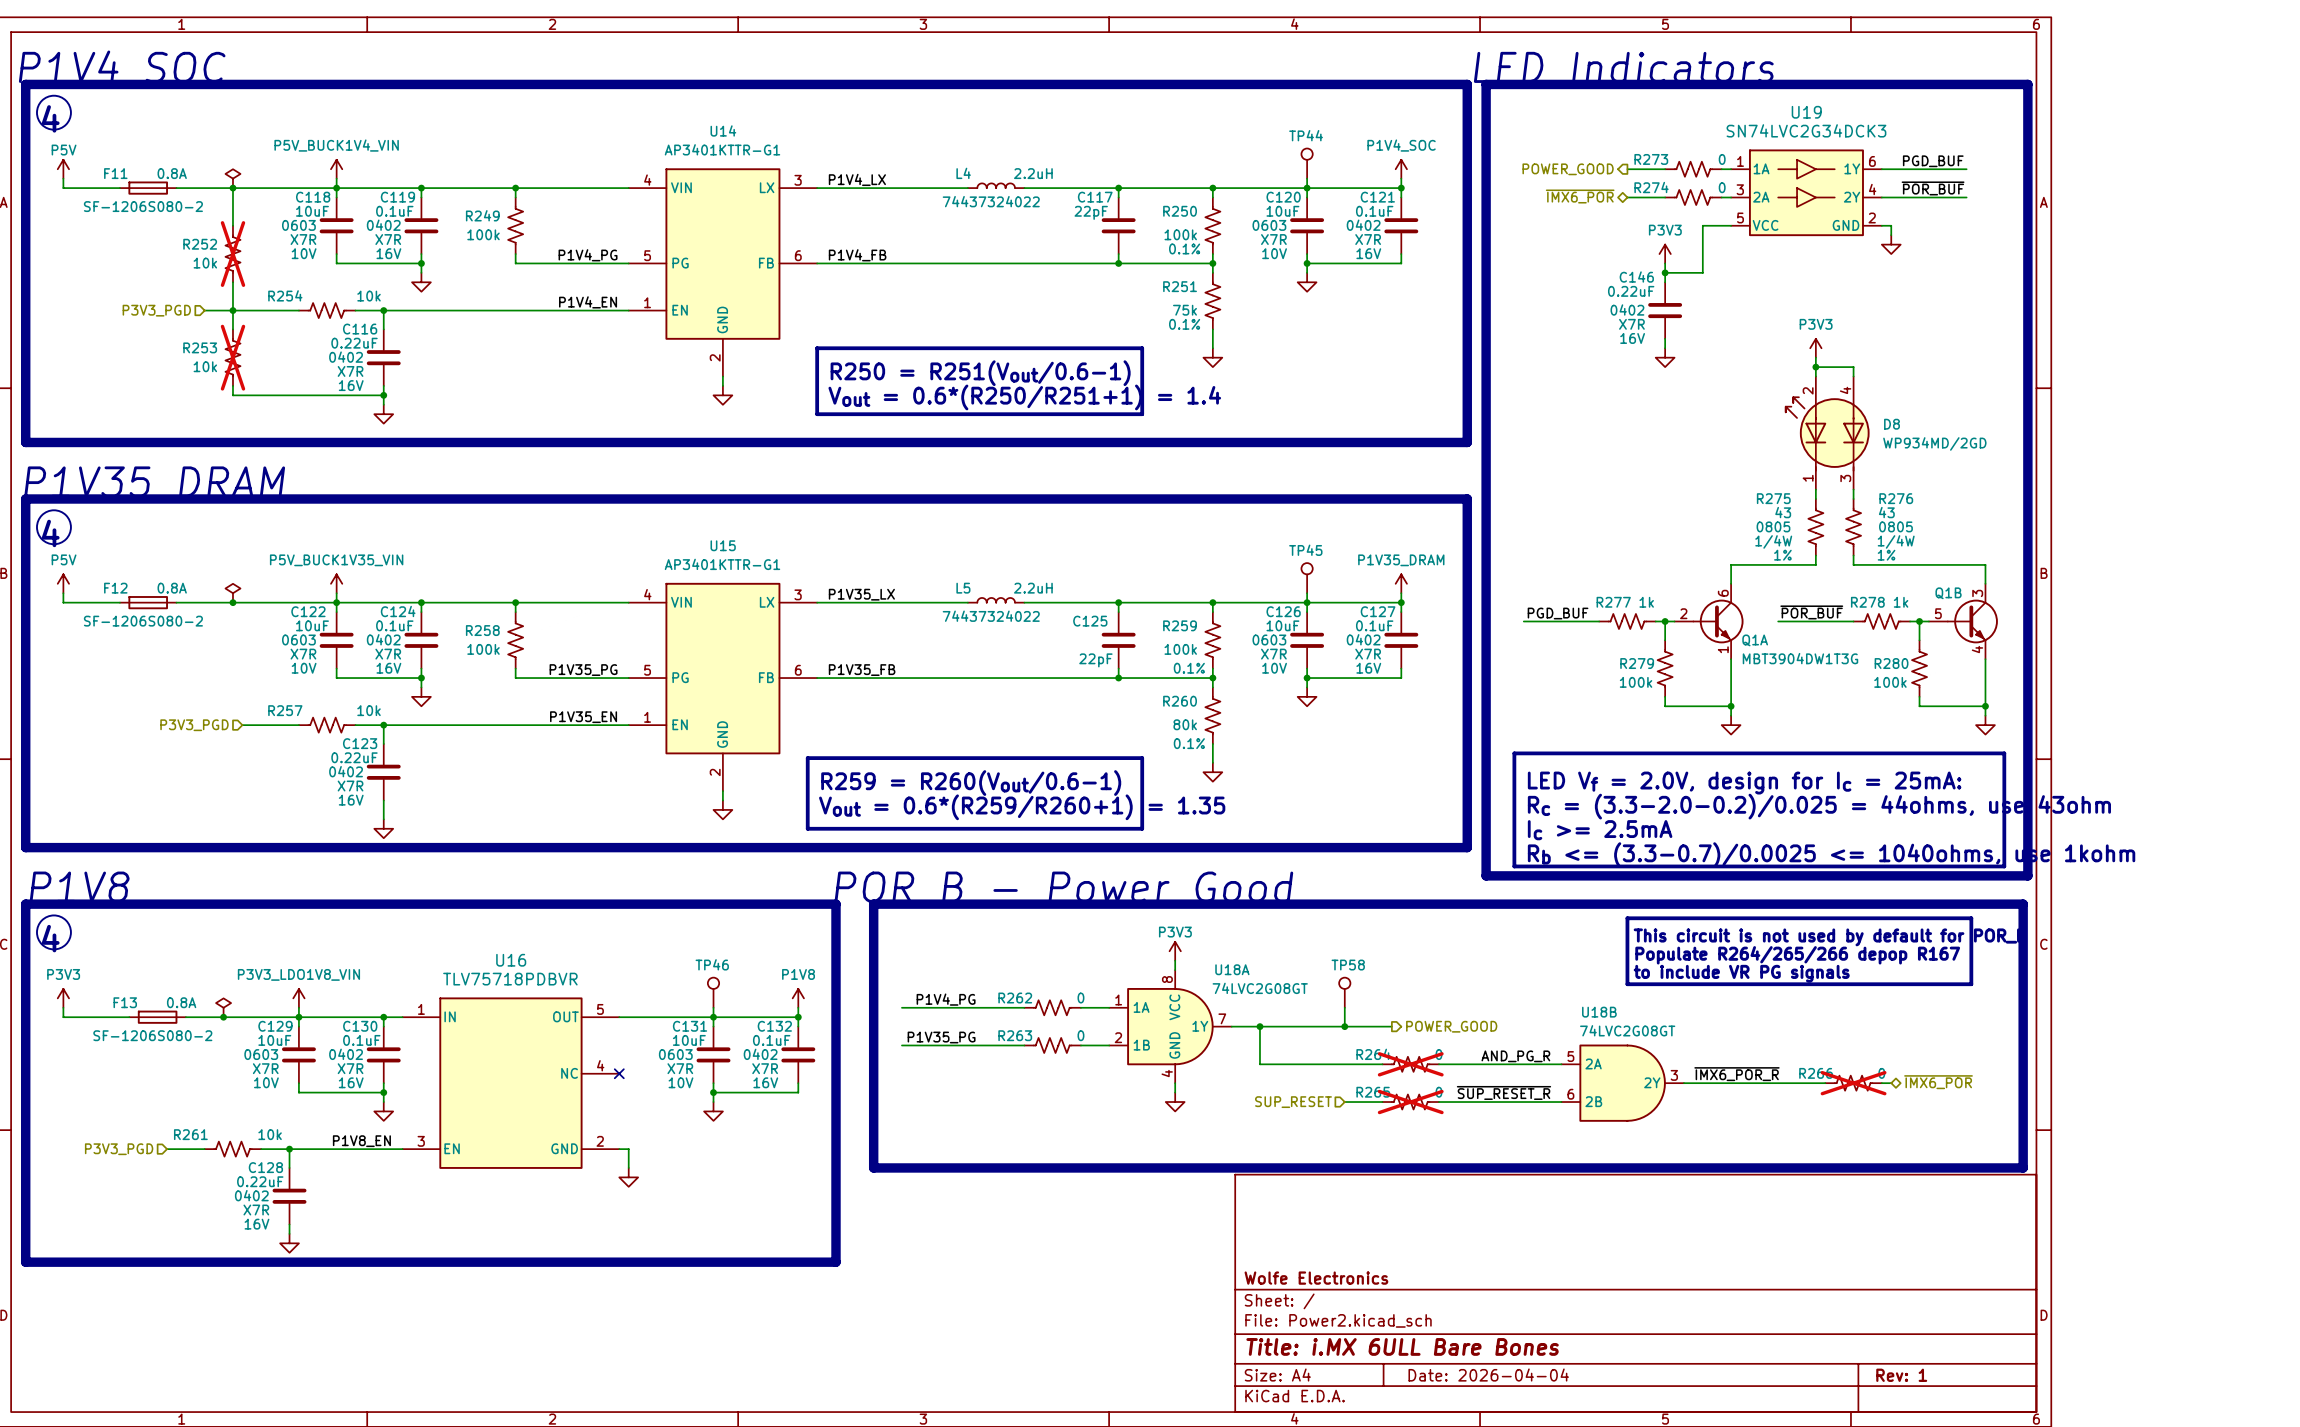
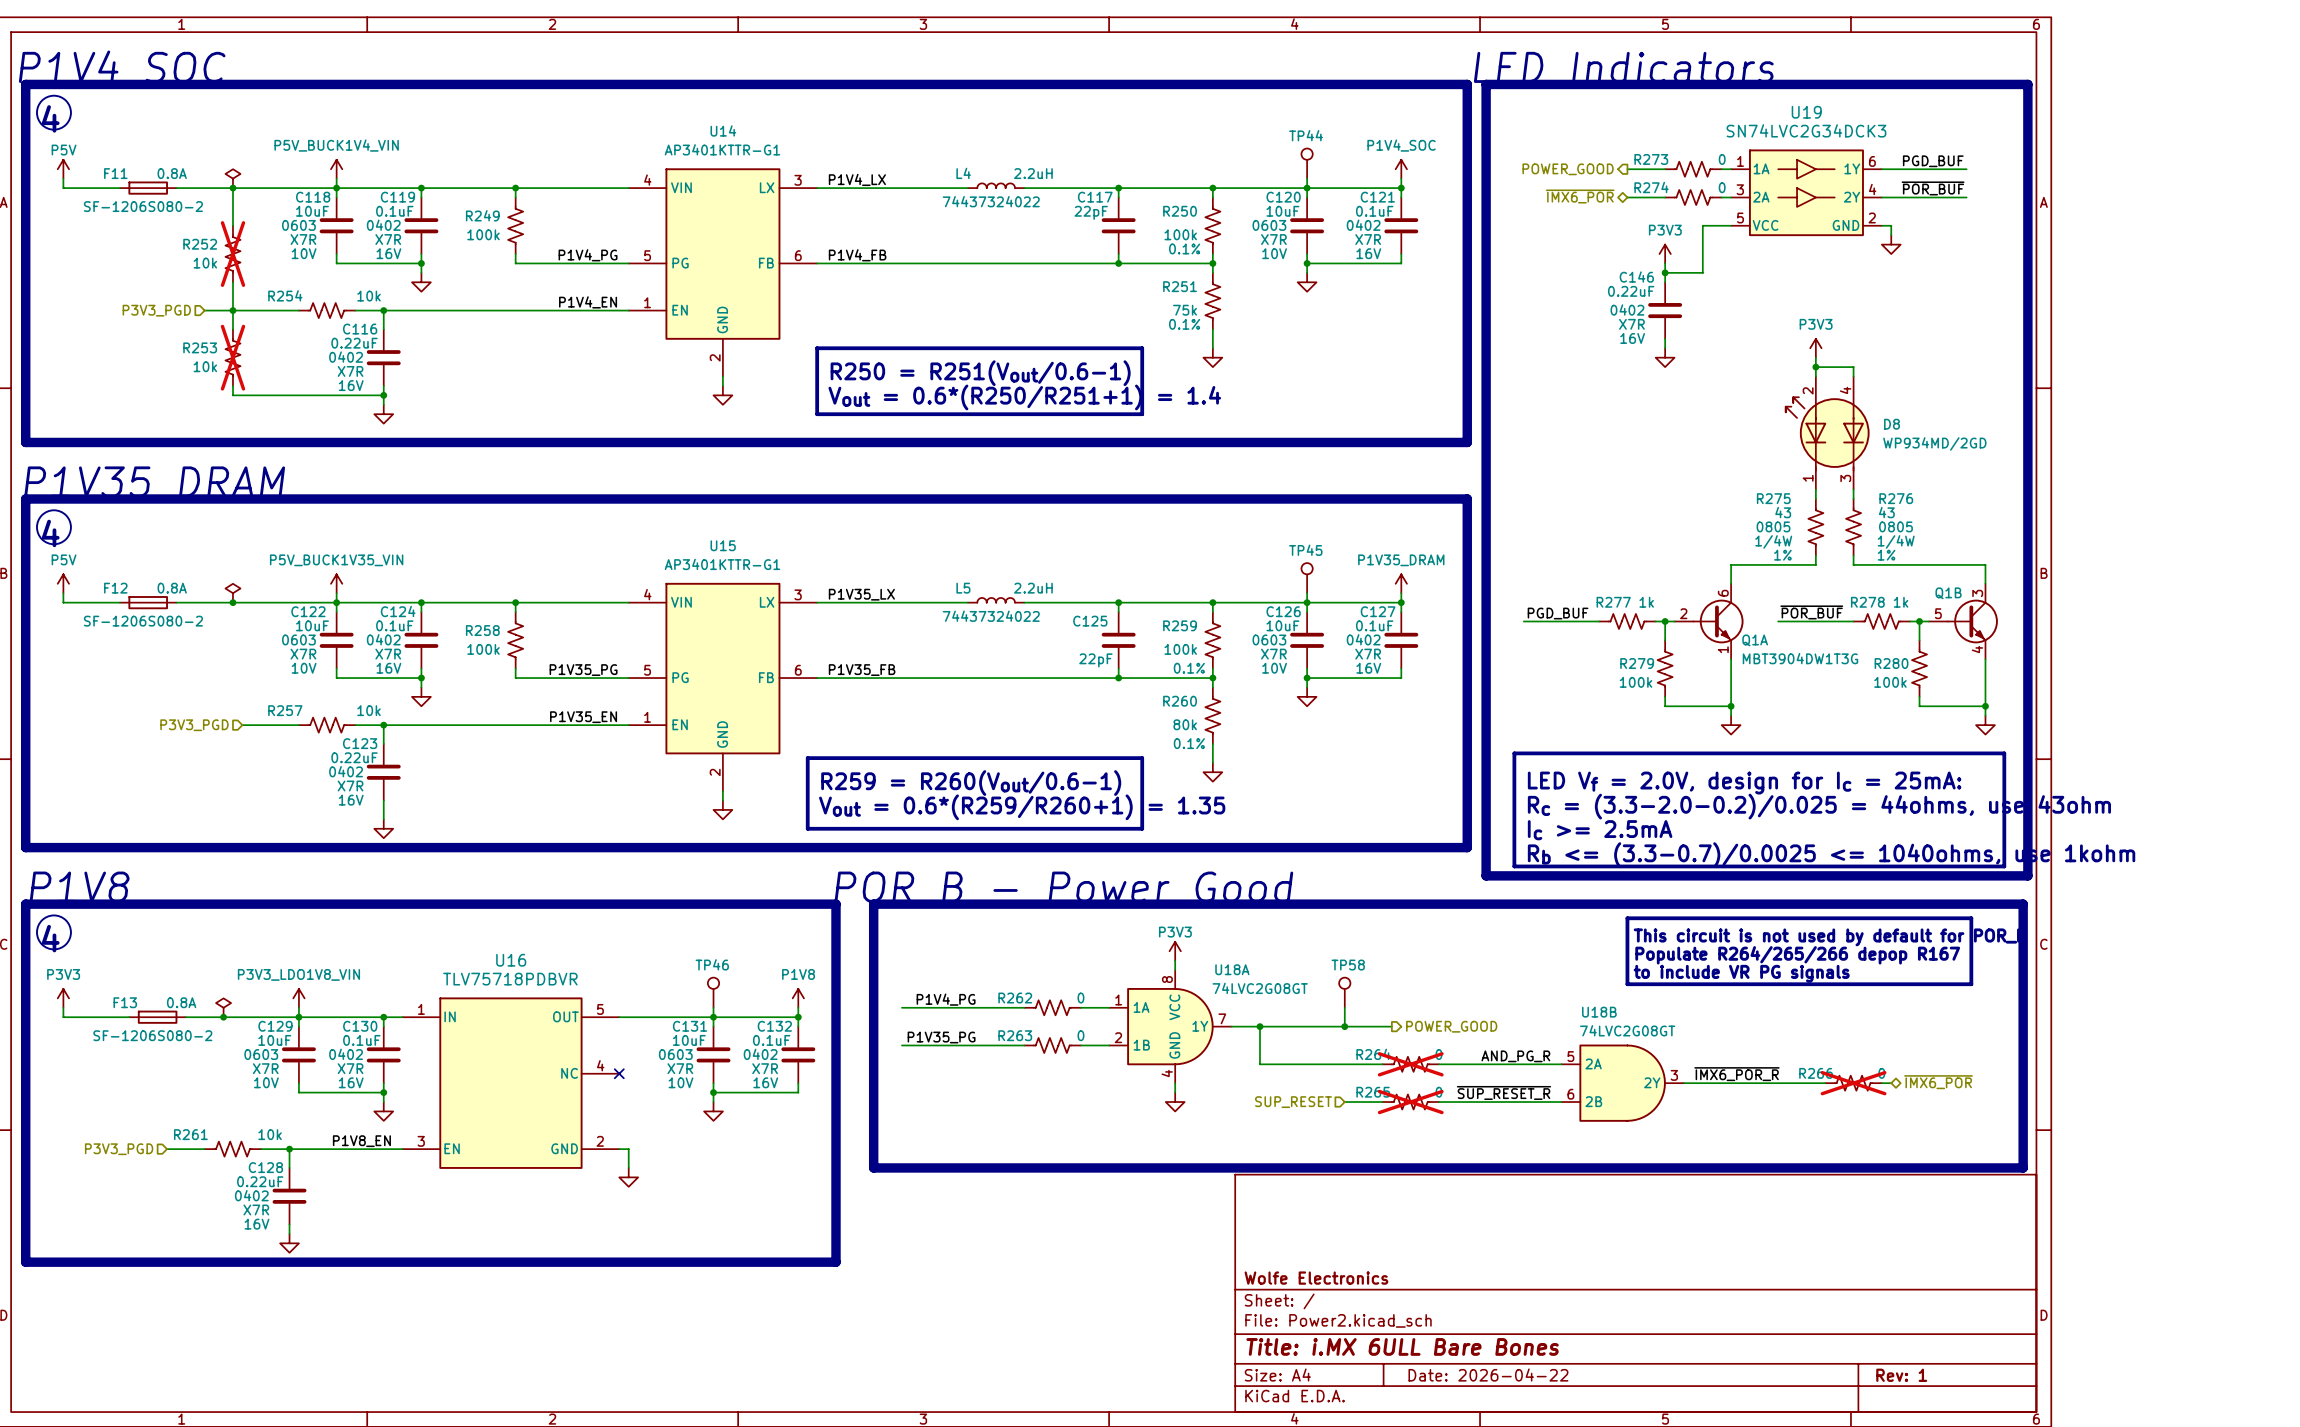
title block: Date: 2026-04-04 (1488, 1375) -> Date: 2026-04-22 (1488, 1375)

